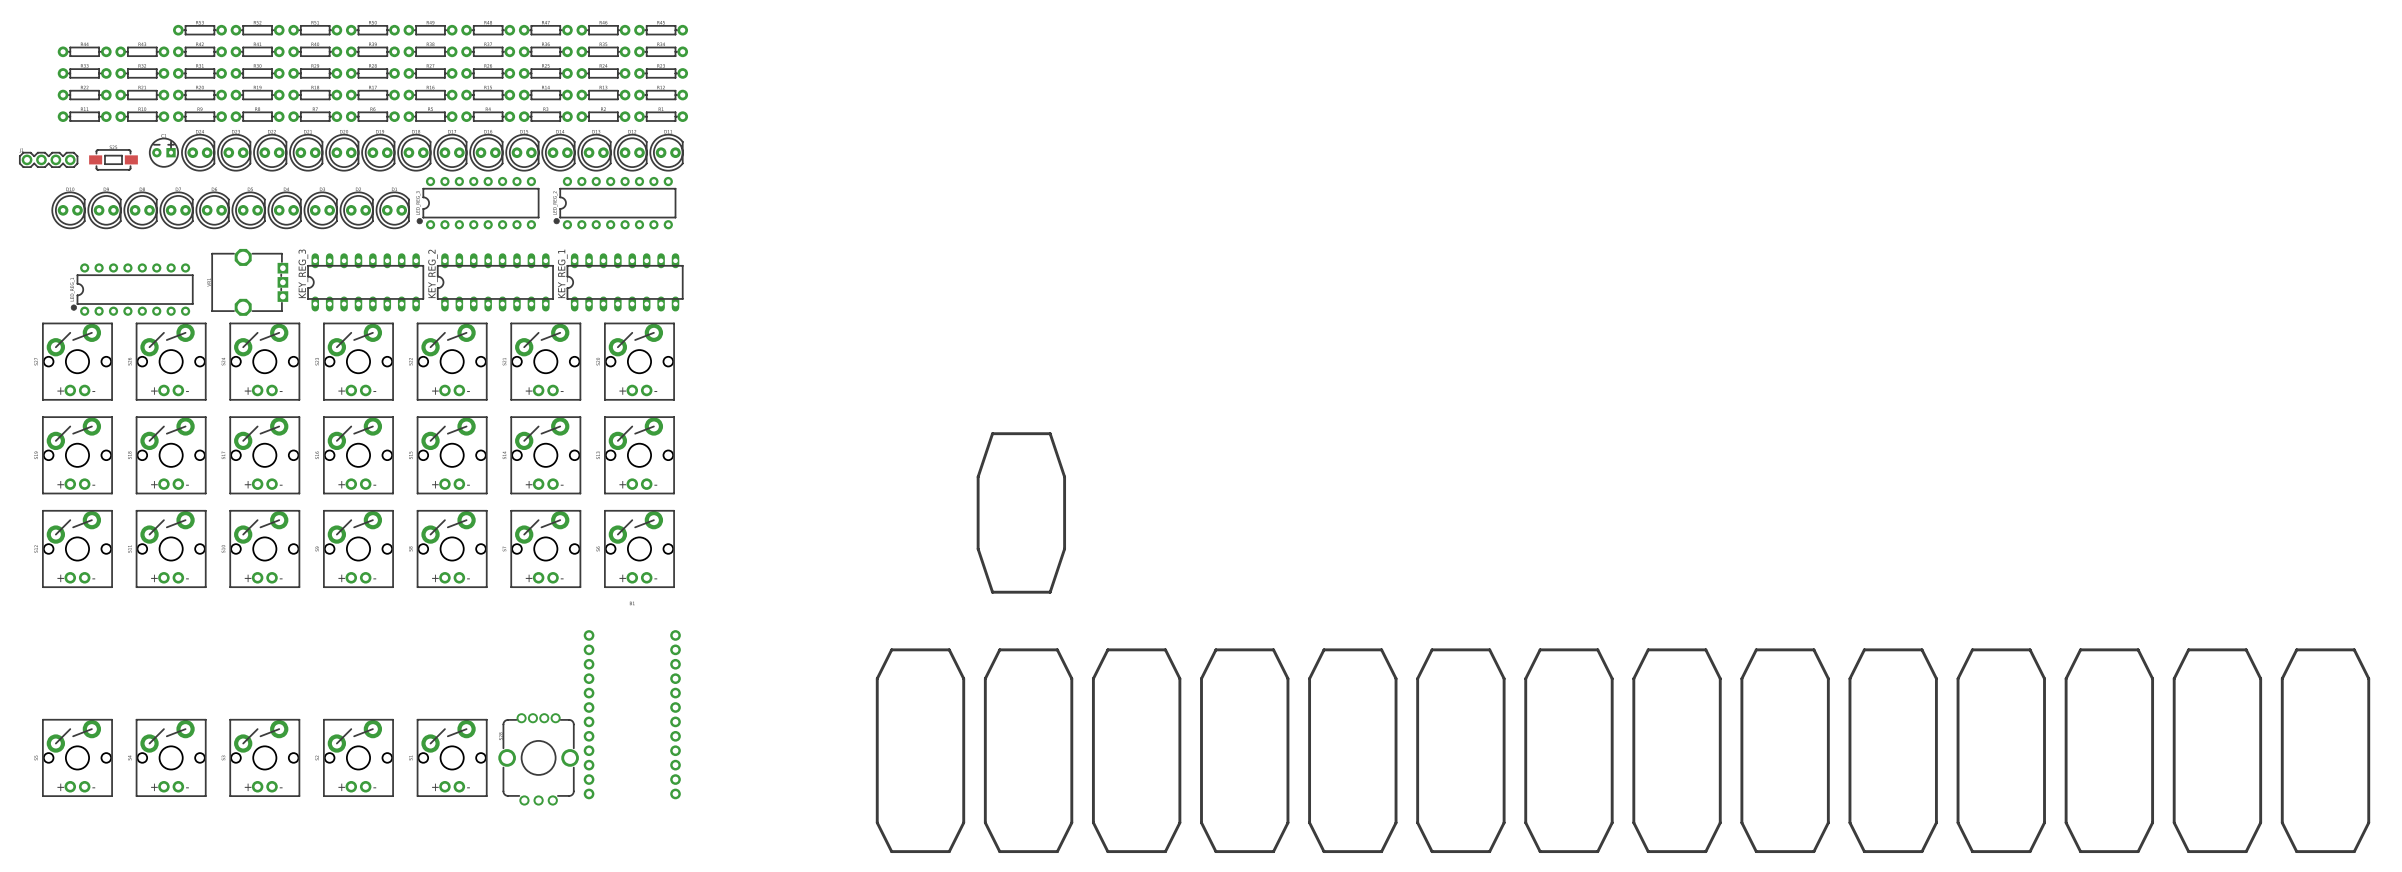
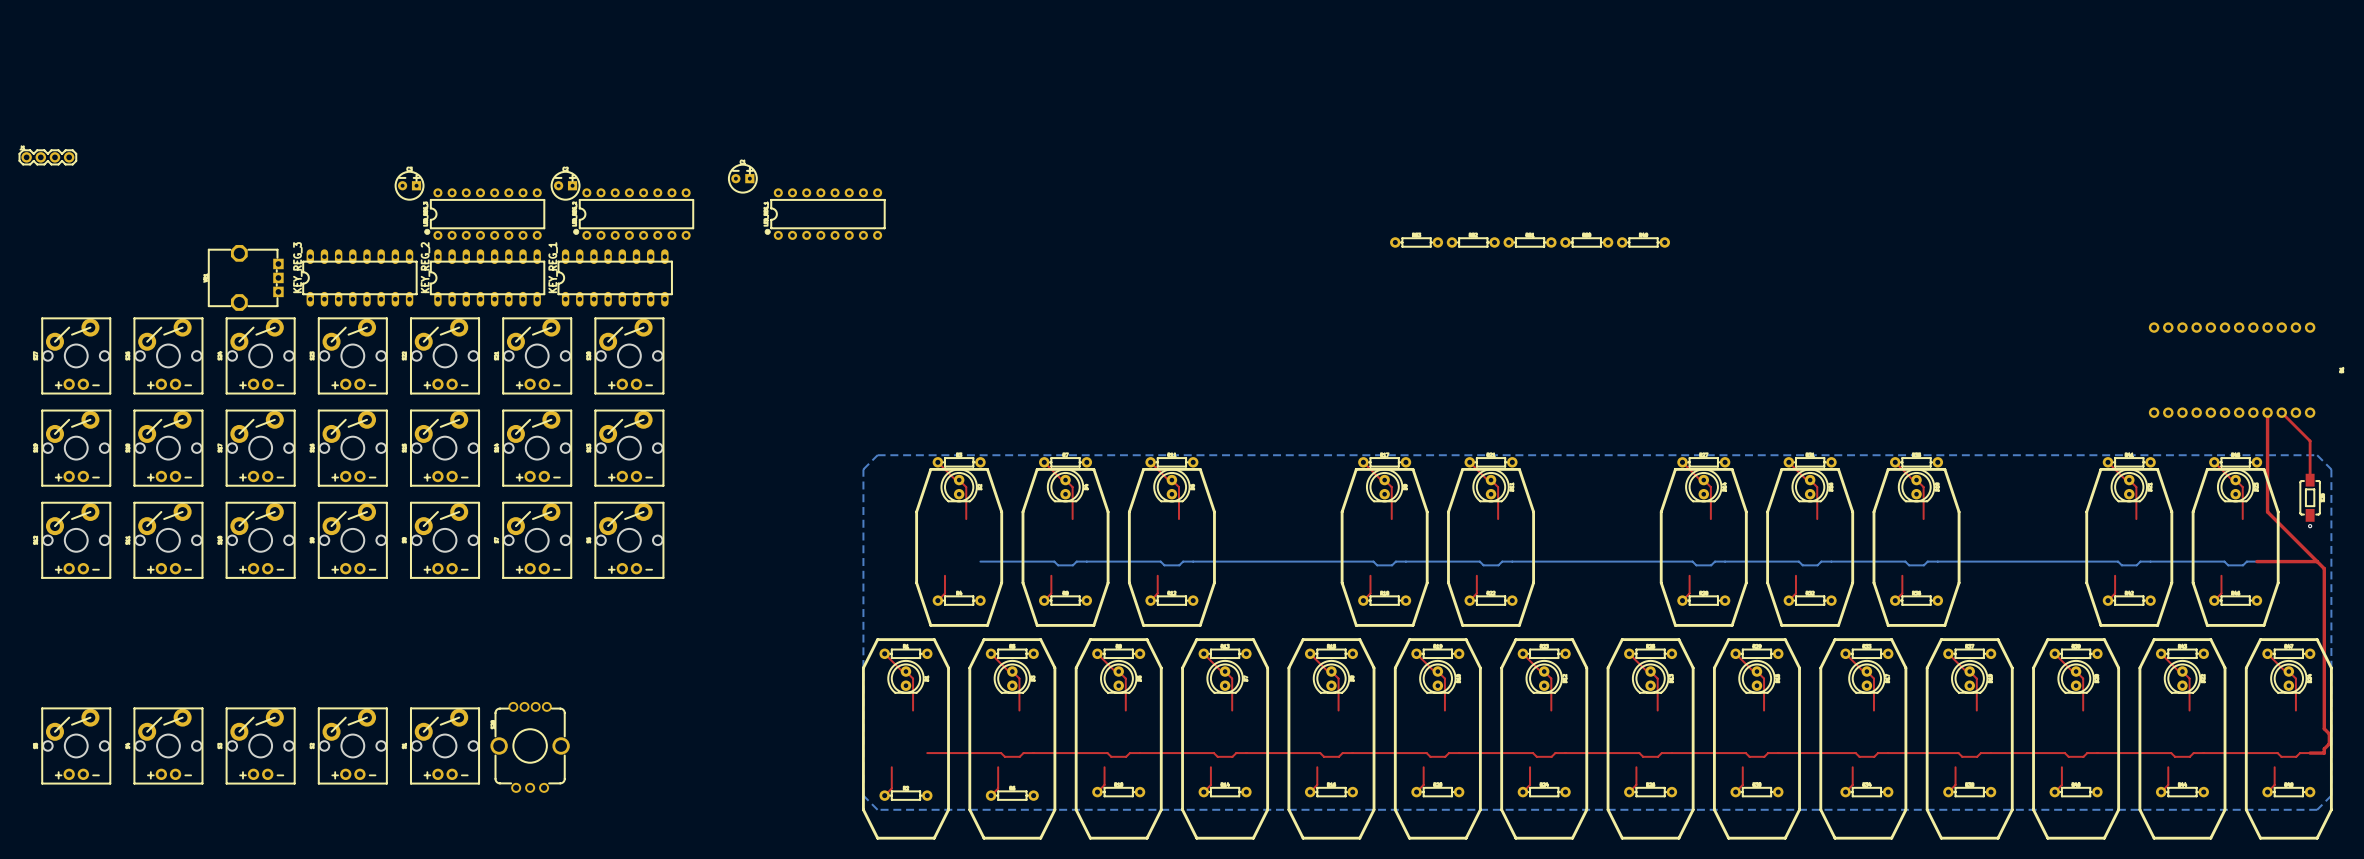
part position: (199, 30) -> (1416, 242)
part position: (257, 30) -> (1473, 242)
part position: (315, 30) -> (1530, 242)
part position: (372, 30) -> (1586, 242)
part position: (430, 30) -> (1643, 242)
part position: (488, 30) -> (2288, 792)
part position: (545, 30) -> (2288, 653)
part position: (603, 30) -> (2235, 600)
part position: (661, 30) -> (2235, 462)
part position: (84, 51) -> (2182, 792)
part position: (142, 51) -> (2182, 653)
part position: (199, 51) -> (2129, 600)
part position: (257, 51) -> (2129, 462)
part position: (315, 51) -> (2076, 792)
part position: (372, 51) -> (2076, 653)
part position: (430, 51) -> (1969, 792)
part position: (488, 51) -> (1969, 653)
part position: (545, 51) -> (1916, 600)
part position: (603, 51) -> (1916, 462)
part position: (661, 51) -> (1866, 792)
part position: (84, 73) -> (1866, 653)
part position: (142, 73) -> (1810, 600)
part position: (199, 73) -> (1810, 462)
part position: (257, 73) -> (1756, 792)
part position: (315, 73) -> (1756, 653)
part position: (372, 73) -> (1703, 600)
part position: (430, 73) -> (1703, 462)
part position: (488, 73) -> (1650, 792)
part position: (545, 73) -> (1650, 653)
part position: (603, 73) -> (1544, 792)
part position: (661, 73) -> (1544, 653)
part position: (84, 95) -> (1491, 600)
part position: (142, 95) -> (1491, 462)
part position: (199, 95) -> (1437, 792)
part position: (257, 95) -> (1437, 653)
part position: (315, 95) -> (1384, 600)
part position: (372, 95) -> (1384, 462)
part position: (430, 95) -> (1331, 792)
part position: (488, 95) -> (1331, 653)
part position: (545, 95) -> (1225, 792)
part position: (603, 95) -> (1225, 653)
part position: (661, 95) -> (1171, 600)
part position: (84, 116) -> (1171, 462)
part position: (142, 116) -> (1118, 792)
part position: (199, 116) -> (1118, 653)
part position: (257, 116) -> (1065, 600)
part position: (315, 116) -> (1065, 462)
part position: (372, 116) -> (1012, 795)
part position: (430, 116) -> (1012, 653)
part position: (488, 116) -> (959, 600)
part position: (545, 116) -> (959, 462)
part position: (603, 116) -> (905, 795)
part position: (661, 116) -> (905, 653)
part position: (163, 152) -> (742, 178)
part rotation: 0° (198, 152) -> 90° clockwise (2288, 676)
part position: (198, 152) -> (2288, 676)
part rotation: 0° (234, 152) -> 90° clockwise (2235, 485)
part position: (234, 152) -> (2235, 485)
part rotation: 0° (270, 152) -> 90° clockwise (2182, 676)
part position: (270, 152) -> (2182, 676)
part rotation: 0° (306, 152) -> 90° clockwise (2129, 485)
part position: (306, 152) -> (2129, 485)
part rotation: 0° (342, 152) -> 90° clockwise (2076, 676)
part position: (342, 152) -> (2076, 676)
part rotation: 0° (378, 152) -> 90° clockwise (1969, 676)
part position: (378, 152) -> (1969, 676)
part rotation: 0° (414, 152) -> 90° clockwise (1916, 485)
part position: (414, 152) -> (1916, 485)
part rotation: 0° (450, 152) -> 90° clockwise (1866, 676)
part position: (450, 152) -> (1866, 676)
part rotation: 0° (486, 152) -> 90° clockwise (1810, 485)
part position: (486, 152) -> (1810, 485)
part rotation: 0° (522, 152) -> 90° clockwise (1756, 676)
part position: (522, 152) -> (1756, 676)
part rotation: 0° (558, 152) -> 90° clockwise (1703, 485)
part position: (558, 152) -> (1703, 485)
part rotation: 0° (594, 152) -> 90° clockwise (1650, 676)
part position: (594, 152) -> (1650, 676)
part rotation: 0° (630, 152) -> 90° clockwise (1544, 676)
part position: (630, 152) -> (1544, 676)
part rotation: 0° (666, 152) -> 90° clockwise (1491, 485)
part position: (666, 152) -> (1491, 485)
part rotation: 0° (113, 159) -> 90° clockwise (2310, 497)
part position: (113, 159) -> (2310, 497)
part: none -> (409, 185)
part: none -> (565, 185)
part position: (477, 203) -> (484, 214)
part position: (614, 203) -> (633, 214)
part rotation: 0° (68, 210) -> 90° clockwise (1437, 676)
part position: (68, 210) -> (1437, 676)
part rotation: 0° (104, 210) -> 90° clockwise (1384, 485)
part position: (104, 210) -> (1384, 485)
part rotation: 0° (140, 210) -> 90° clockwise (1331, 676)
part position: (140, 210) -> (1331, 676)
part rotation: 0° (176, 210) -> 90° clockwise (1225, 676)
part position: (176, 210) -> (1225, 676)
part rotation: 0° (212, 210) -> 90° clockwise (1171, 485)
part position: (212, 210) -> (1171, 485)
part rotation: 0° (248, 210) -> 90° clockwise (1118, 676)
part position: (248, 210) -> (1118, 676)
part rotation: 0° (284, 210) -> 90° clockwise (1065, 485)
part position: (284, 210) -> (1065, 485)
part rotation: 0° (320, 210) -> 90° clockwise (1012, 676)
part position: (320, 210) -> (1012, 676)
part rotation: 0° (356, 210) -> 90° clockwise (959, 485)
part position: (356, 210) -> (959, 485)
part rotation: 0° (392, 210) -> 90° clockwise (905, 676)
part position: (392, 210) -> (905, 676)
part position: (132, 289) -> (824, 214)
top track: none -> (2267, 412) (2267, 511) (2324, 568) (2324, 728) (2329, 733) (2329, 743) (2324, 748) (2324, 753) (2300, 753) (2296, 756) (2281, 756) (2277, 753) (2193, 753) (2189, 756) (2175, 756) (2171, 753) (2087, 753) (2083, 756) (2068, 756) (2064, 753) (1980, 753) (1977, 756) (1962, 756) (1958, 753) (1878, 753) (1874, 756) (1859, 756) (1855, 753) (1768, 753) (1764, 756) (1749, 756) (1745, 753) (1661, 753) (1658, 756) (1643, 756) (1639, 753) (1555, 753) (1551, 756) (1536, 756) (1533, 753) (1449, 753) (1445, 756) (1430, 756) (1426, 753) (1342, 753) (1338, 756) (1324, 756) (1320, 753) (1236, 753) (1232, 756) (1217, 756) (1213, 753) (1129, 753) (1126, 756) (1111, 756) (1107, 753) (1023, 753) (1019, 756) (1004, 756) (1001, 753) (927, 753)
top track: none -> (2281, 412) (2310, 441) (2310, 480)
line: (992, 433) (978, 476) (978, 548) (992, 592) (1050, 592) (1064, 548) (1064, 476) (1050, 433) (992, 433) -> (930, 469) (916, 511) (916, 582) (930, 625) (987, 625) (1001, 582) (1001, 511) (987, 469) (930, 469)
bottom zone outline: none -> (877, 455) (863, 469) (863, 795) (877, 809) (2317, 809) (2331, 795) (2331, 469) (2317, 455) (877, 455)
top track: none -> (937, 462) (955, 480) (959, 480) (966, 487) (966, 519)
top track: none -> (1044, 462) (1061, 480) (1065, 480) (1072, 487) (1072, 519)
top track: none -> (1150, 462) (1168, 480) (1171, 480) (1179, 487) (1179, 519)
top track: none -> (1363, 462) (1381, 480) (1384, 480) (1391, 487) (1391, 519)
top track: none -> (1469, 462) (1487, 480) (1491, 480) (1498, 487) (1498, 519)
top track: none -> (1682, 462) (1700, 480) (1703, 480) (1710, 487) (1710, 519)
top track: none -> (1788, 462) (1806, 480) (1810, 480) (1817, 487) (1817, 519)
top track: none -> (1895, 462) (1912, 480) (1916, 480) (1923, 487) (1923, 519)
top track: none -> (2108, 462) (2125, 480) (2129, 480) (2136, 487) (2136, 519)
top track: none -> (2214, 462) (2232, 480) (2235, 480) (2242, 487) (2242, 519)
line: none -> (1037, 469) (1093, 469) (1108, 511) (1108, 582) (1093, 625) (1037, 625) (1022, 582) (1022, 511) (1037, 469)
line: none -> (1143, 469) (1200, 469) (1214, 511) (1214, 582) (1200, 625) (1143, 625) (1129, 582) (1129, 511) (1143, 469)
line: none -> (1356, 469) (1413, 469) (1427, 511) (1427, 582) (1413, 625) (1356, 625) (1342, 582) (1342, 511) (1356, 469)
line: none -> (1462, 469) (1519, 469) (1533, 511) (1533, 582) (1519, 625) (1462, 625) (1448, 582) (1448, 511) (1462, 469)
line: none -> (1675, 469) (1732, 469) (1746, 511) (1746, 582) (1732, 625) (1675, 625) (1661, 582) (1661, 511) (1675, 469)
line: none -> (1781, 469) (1838, 469) (1852, 511) (1852, 582) (1838, 625) (1781, 625) (1767, 582) (1767, 511) (1781, 469)
line: none -> (1888, 469) (1944, 469) (1959, 511) (1959, 582) (1944, 625) (1888, 625) (1873, 582) (1873, 511) (1888, 469)
line: none -> (2100, 469) (2157, 469) (2171, 511) (2171, 582) (2157, 625) (2100, 625) (2086, 582) (2086, 511) (2100, 469)
line: none -> (2207, 469) (2264, 469) (2278, 511) (2278, 582) (2264, 625) (2207, 625) (2193, 582) (2193, 511) (2207, 469)
via: none -> (2310, 526)
bottom track: none -> (980, 561) (1054, 561) (1058, 565) (1072, 565) (1076, 561) (1160, 561) (1164, 565) (1179, 565) (1183, 561) (1373, 561) (1377, 565) (1392, 565) (1395, 561) (1479, 561) (1483, 565) (1498, 565) (1502, 561) (1692, 561) (1696, 565) (1711, 565) (1714, 561) (1798, 561) (1802, 565) (1817, 565) (1821, 561) (1905, 561) (1909, 565) (1923, 565) (1927, 561) (2118, 561) (2121, 565) (2136, 565) (2140, 561) (2224, 561) (2228, 565) (2243, 565) (2246, 561) (2256, 561)
top track: none -> (2256, 561) (2317, 561)
top track: none -> (944, 575) (944, 593) (937, 600)
top track: none -> (1051, 575) (1051, 593) (1044, 600)
top track: none -> (1157, 575) (1157, 593) (1150, 600)
top track: none -> (1370, 575) (1370, 593) (1363, 600)
top track: none -> (1476, 575) (1476, 593) (1469, 600)
top track: none -> (1689, 575) (1689, 593) (1682, 600)
top track: none -> (1795, 575) (1795, 593) (1788, 600)
top track: none -> (1902, 575) (1902, 593) (1895, 600)
top track: none -> (2115, 575) (2115, 593) (2108, 600)
top track: none -> (2221, 575) (2221, 593) (2214, 600)
top track: none -> (884, 653) (902, 671) (905, 671) (913, 678) (913, 710)
top track: none -> (991, 653) (1008, 671) (1012, 671) (1019, 678) (1019, 710)
top track: none -> (1097, 653) (1115, 671) (1118, 671) (1125, 678) (1125, 710)
top track: none -> (1203, 653) (1221, 671) (1225, 671) (1232, 678) (1232, 710)
top track: none -> (1310, 653) (1327, 671) (1331, 671) (1338, 678) (1338, 710)
top track: none -> (1416, 653) (1434, 671) (1437, 671) (1444, 678) (1444, 710)
top track: none -> (1522, 653) (1540, 671) (1544, 671) (1551, 678) (1551, 710)
top track: none -> (1629, 653) (1647, 671) (1650, 671) (1657, 678) (1657, 710)
top track: none -> (1735, 653) (1753, 671) (1756, 671) (1764, 678) (1764, 710)
top track: none -> (1845, 653) (1863, 671) (1866, 671) (1873, 678) (1873, 710)
top track: none -> (1948, 653) (1966, 671) (1969, 671) (1976, 678) (1976, 710)
top track: none -> (2054, 653) (2072, 671) (2076, 671) (2083, 678) (2083, 710)
top track: none -> (2161, 653) (2178, 671) (2182, 671) (2189, 678) (2189, 710)
top track: none -> (2267, 653) (2285, 671) (2288, 671) (2295, 678) (2295, 710)
part rotation: 0° (632, 714) -> 90° clockwise (2232, 370)
part position: (632, 714) -> (2232, 370)
top track: none -> (891, 767) (891, 788) (884, 795)
top track: none -> (998, 767) (998, 788) (991, 795)
top track: none -> (1104, 767) (1104, 784) (1097, 792)
top track: none -> (1210, 767) (1210, 784) (1203, 792)
top track: none -> (1317, 767) (1317, 784) (1310, 792)
top track: none -> (1423, 767) (1423, 784) (1416, 792)
top track: none -> (1530, 767) (1530, 784) (1522, 792)
top track: none -> (1636, 767) (1636, 784) (1629, 792)
top track: none -> (1742, 767) (1742, 784) (1735, 792)
top track: none -> (1852, 767) (1852, 784) (1845, 792)
top track: none -> (1955, 767) (1955, 784) (1948, 792)
top track: none -> (2061, 767) (2061, 784) (2054, 792)
top track: none -> (2168, 767) (2168, 784) (2161, 792)
top track: none -> (2274, 767) (2274, 784) (2267, 792)

